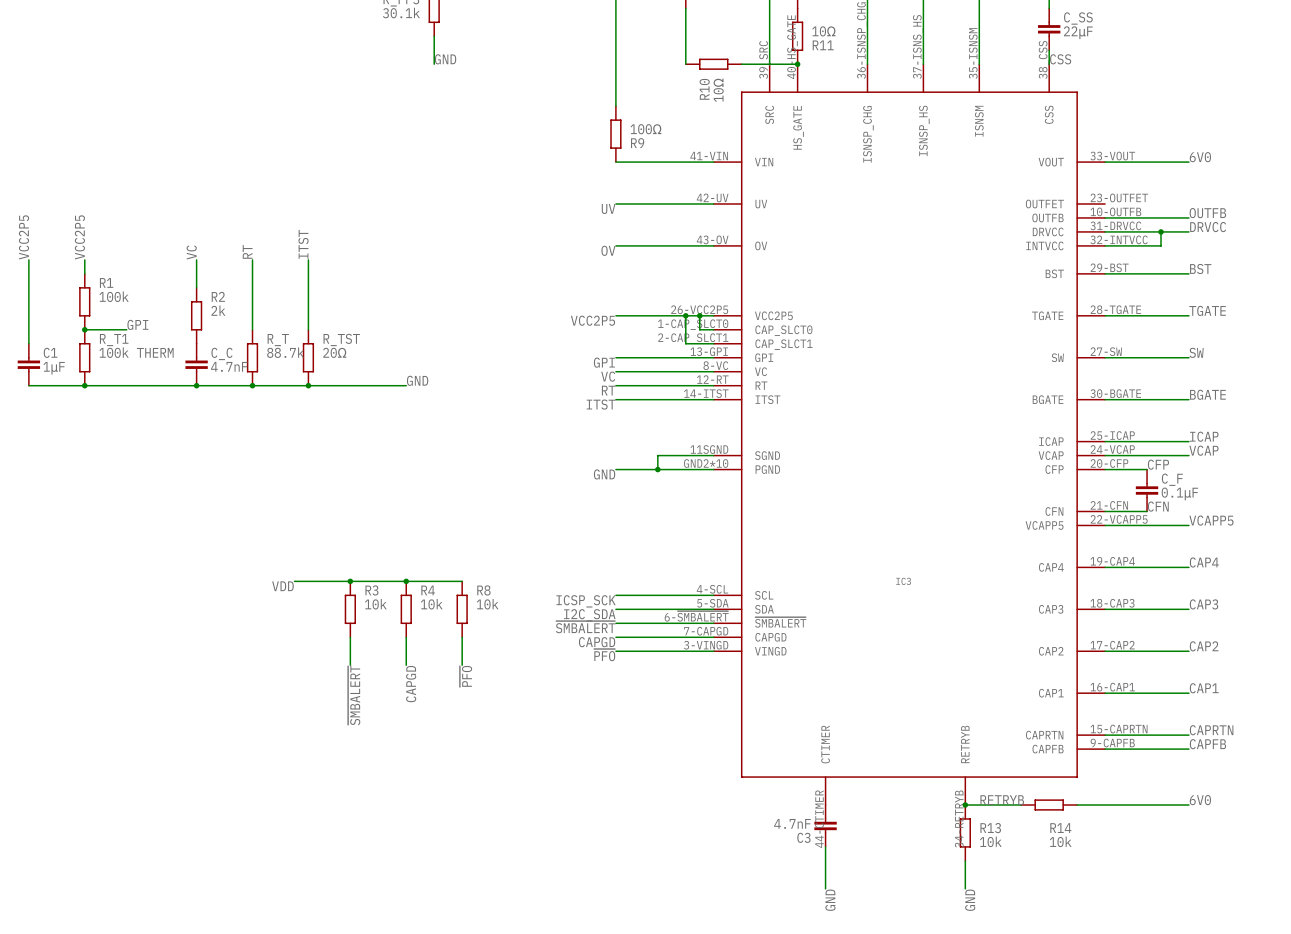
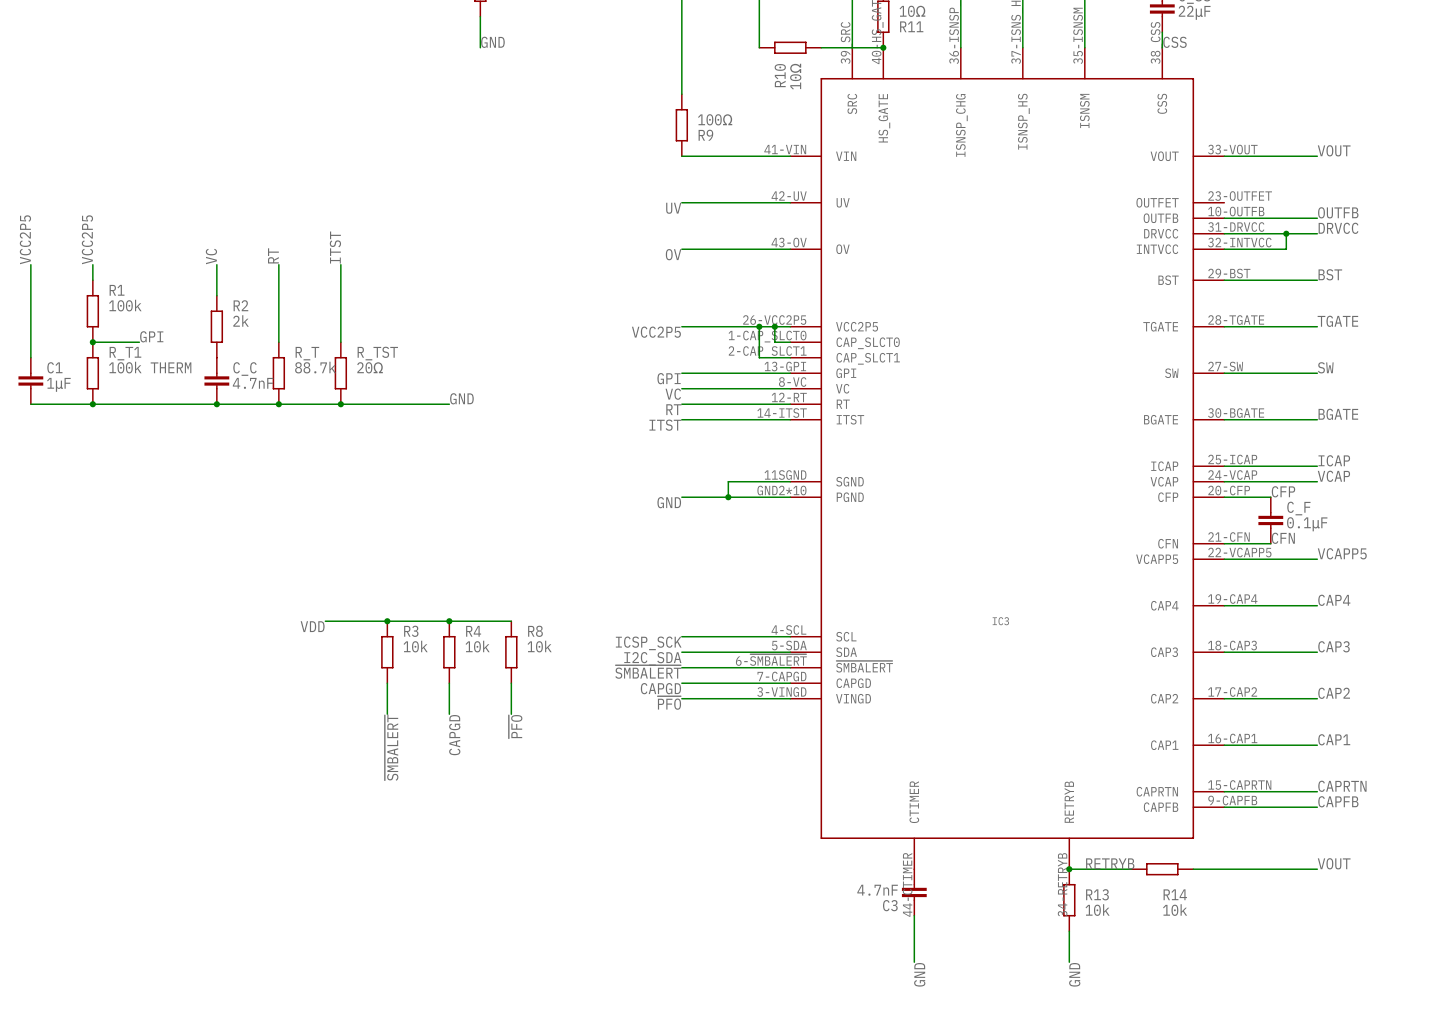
label: 6V0 (1200, 157) -> VOUT (1334, 150)
label: 6V0 (1200, 800) -> VOUT (1334, 863)

